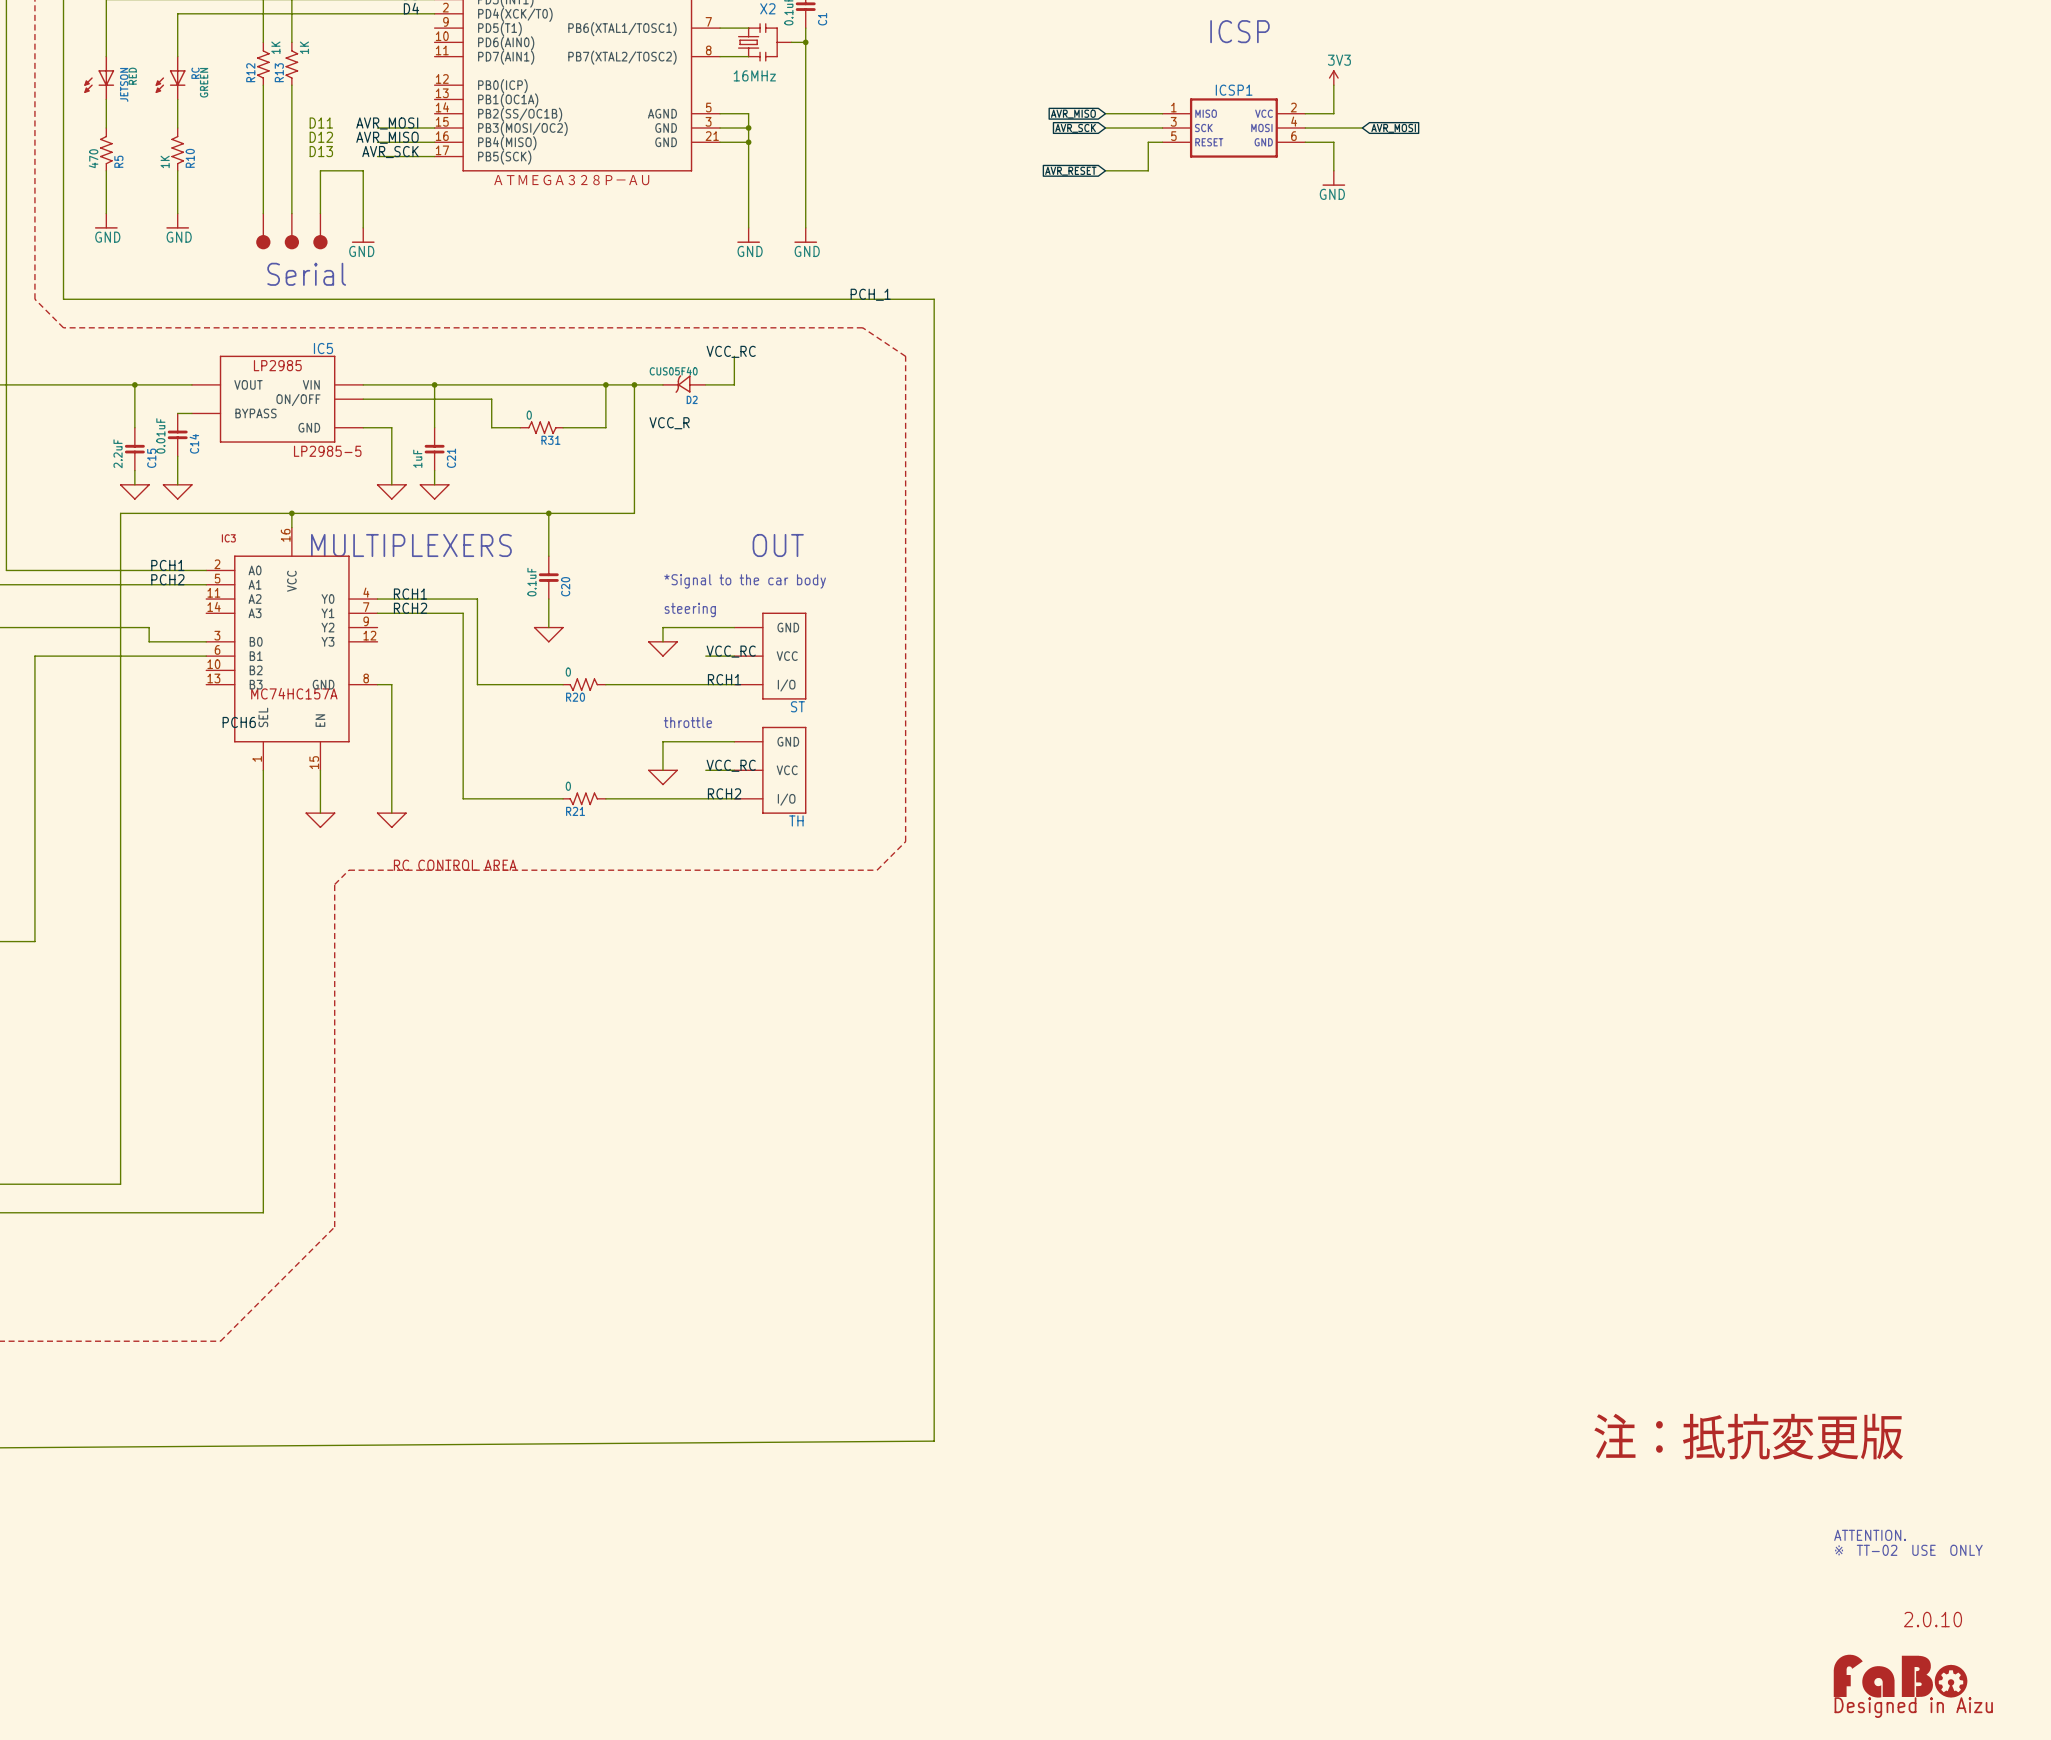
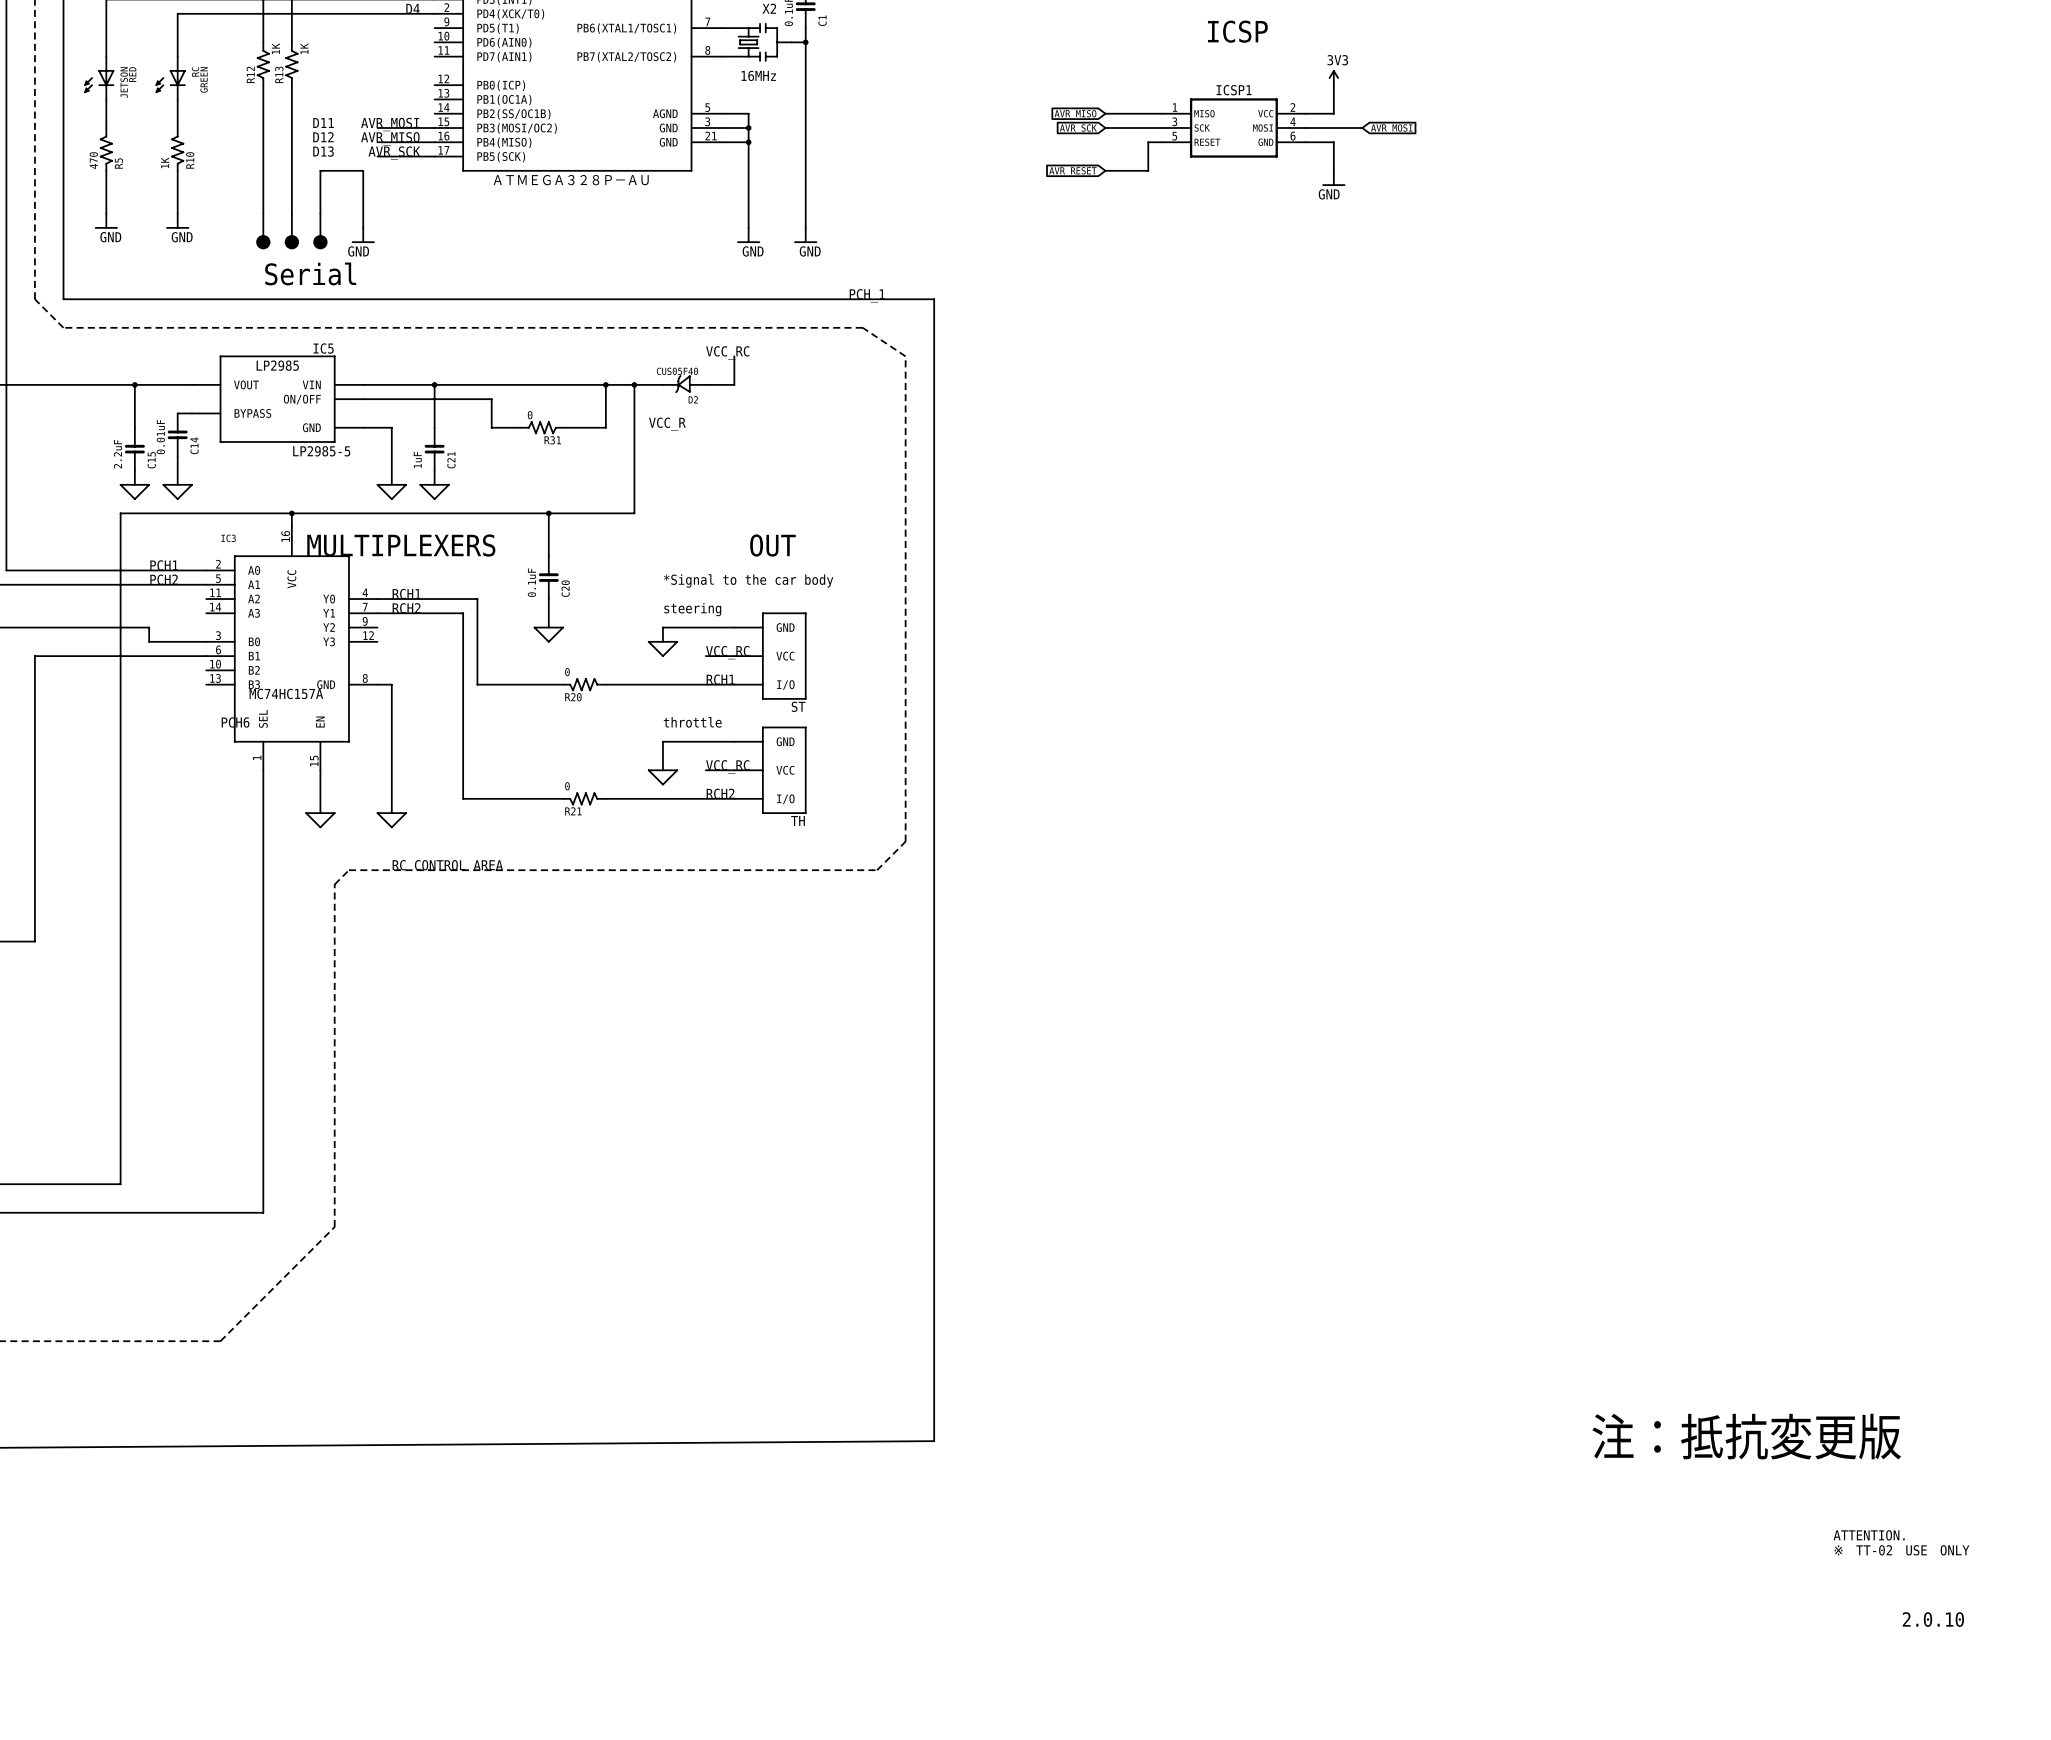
part: (1900, 1676) -> none

